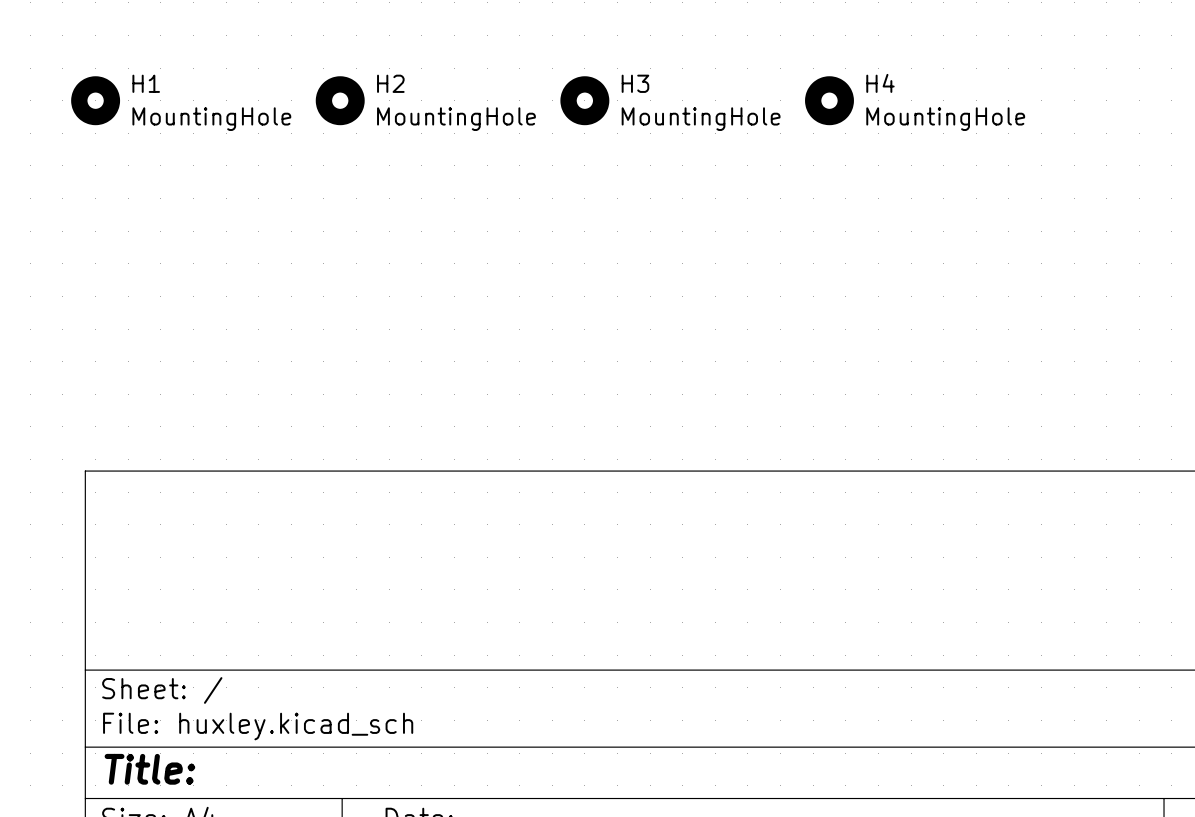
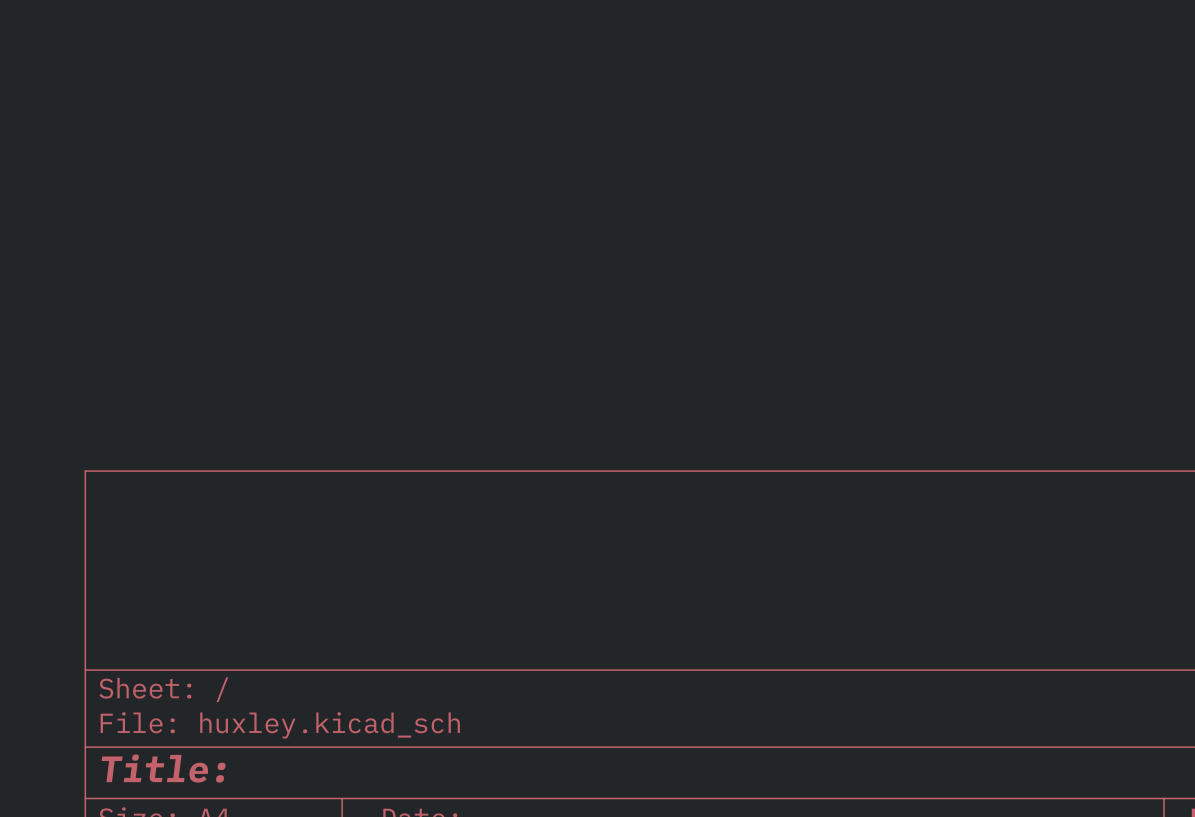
H1: MountingHole (95, 100) -> none
H2: MountingHole (340, 100) -> none
H3: MountingHole (584, 100) -> none
H4: MountingHole (829, 100) -> none

